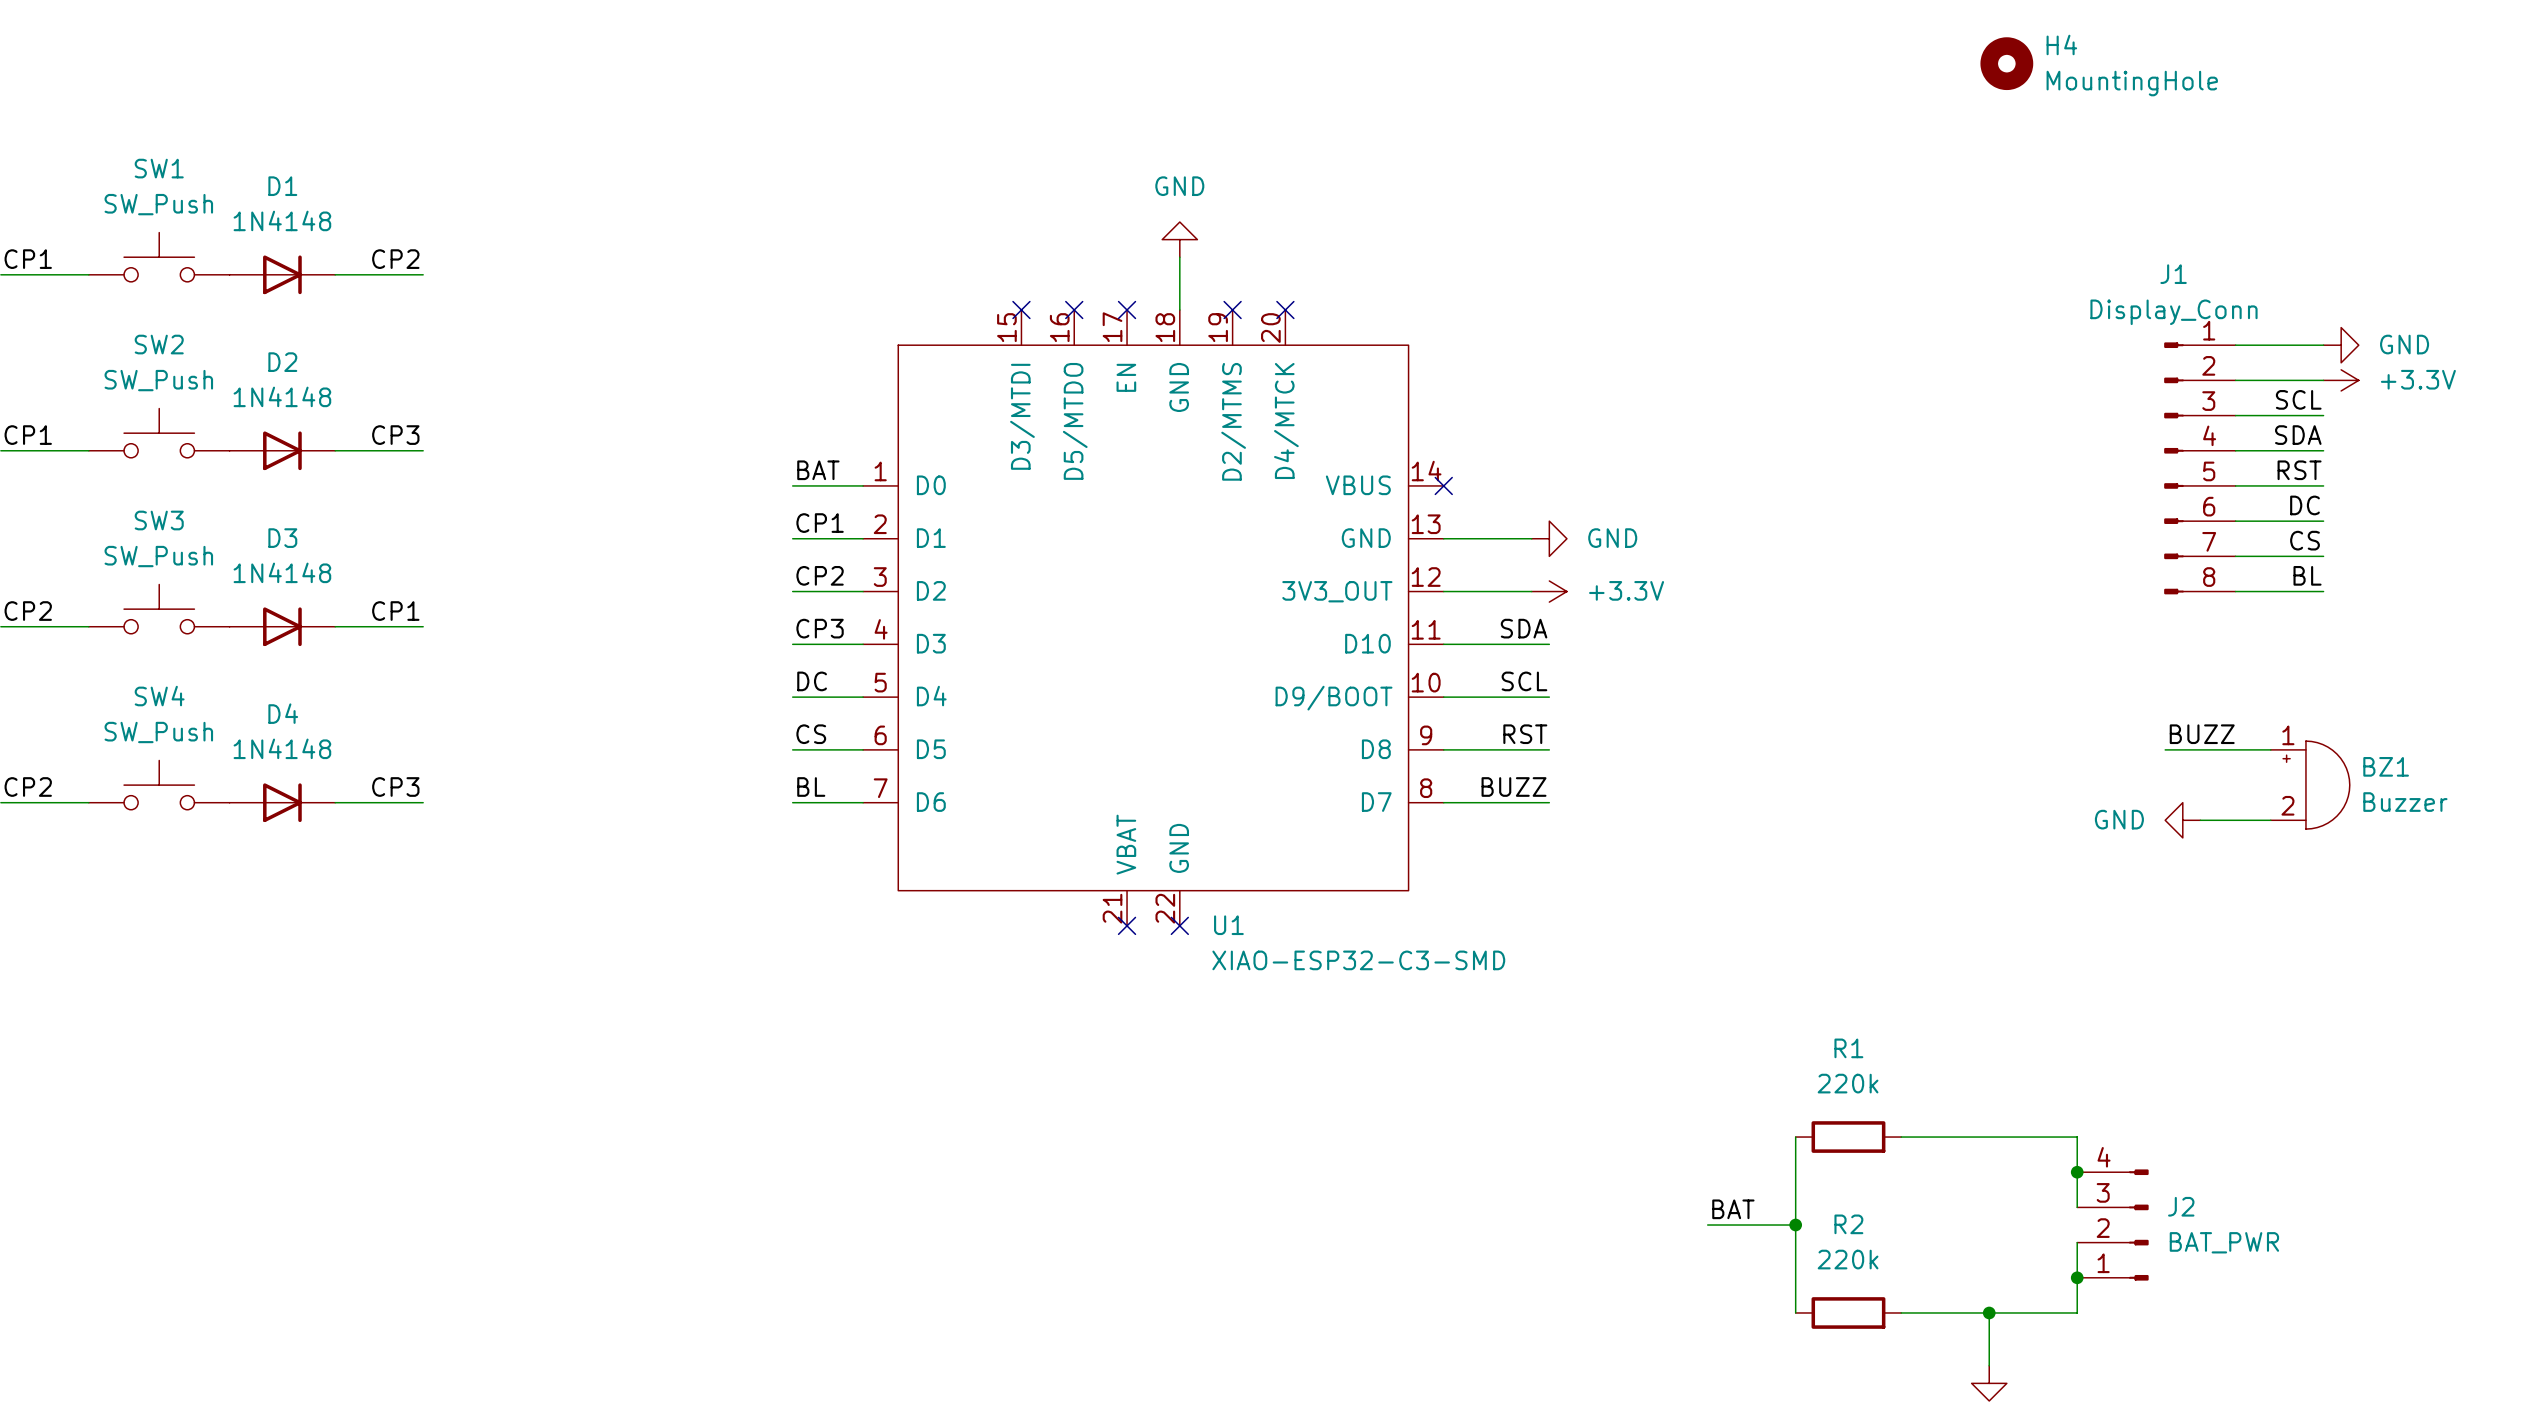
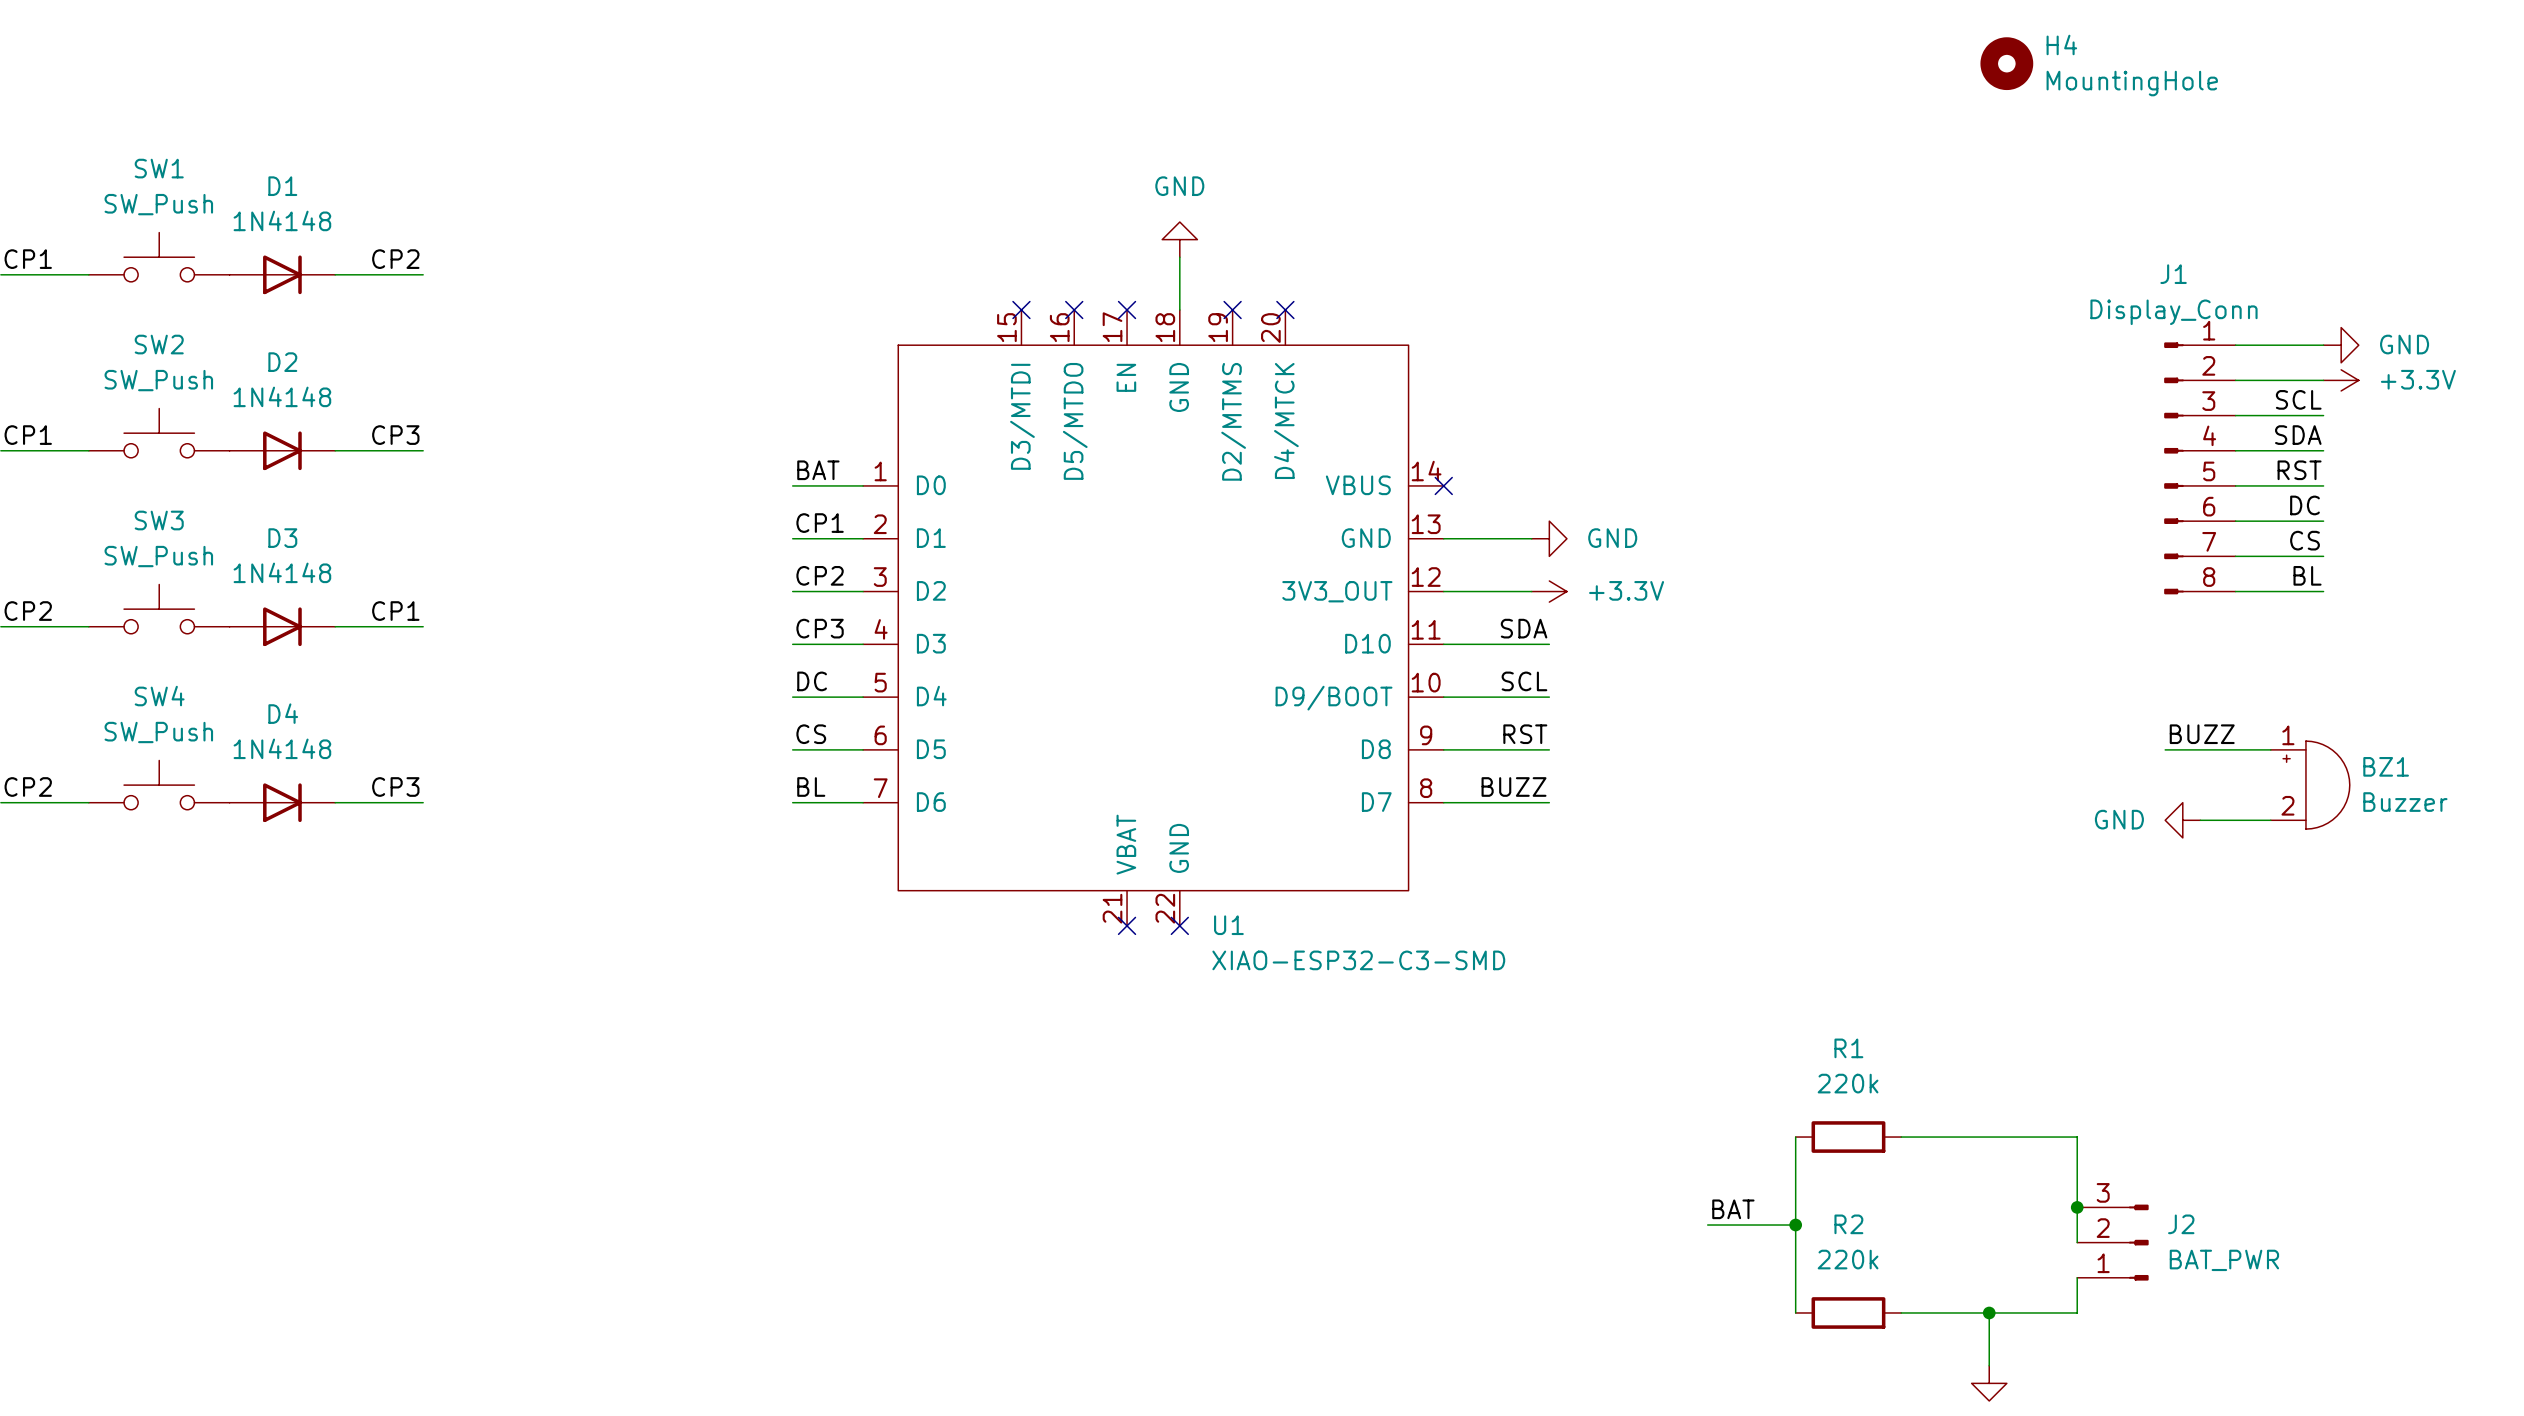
J2 symbol: [2077, 1169, 2149, 1281] -> [2077, 1204, 2149, 1281]
junction: (2077, 1172) -> none
junction: none -> (2077, 1207)
wire: (2077, 1242) (2077, 1277) -> (2077, 1242) (2077, 1207)
junction: (2077, 1277) -> none

